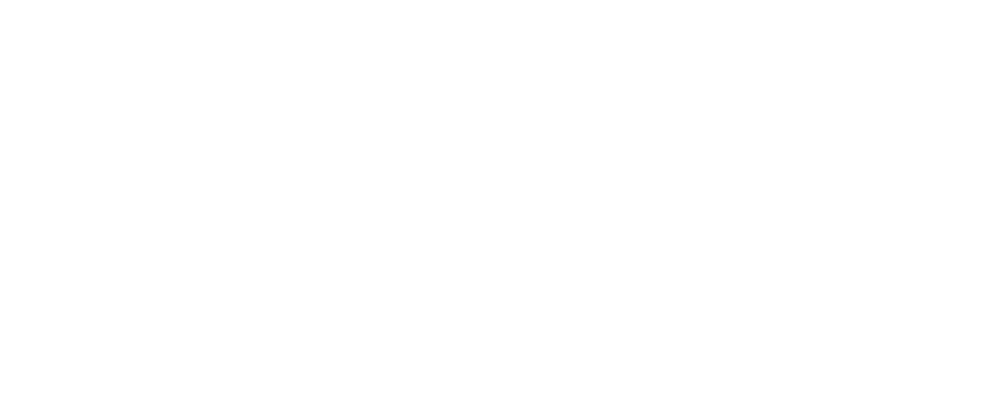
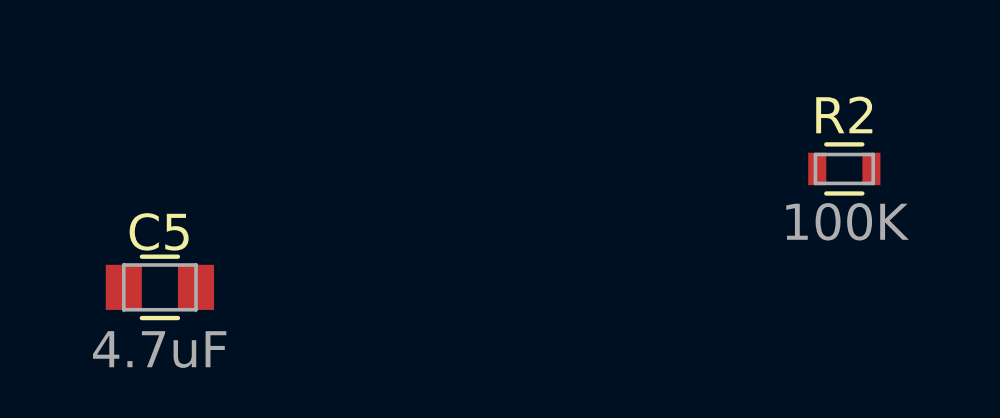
R2: none -> 100K (844, 168)
C5: none -> 4.7uF (159, 287)

